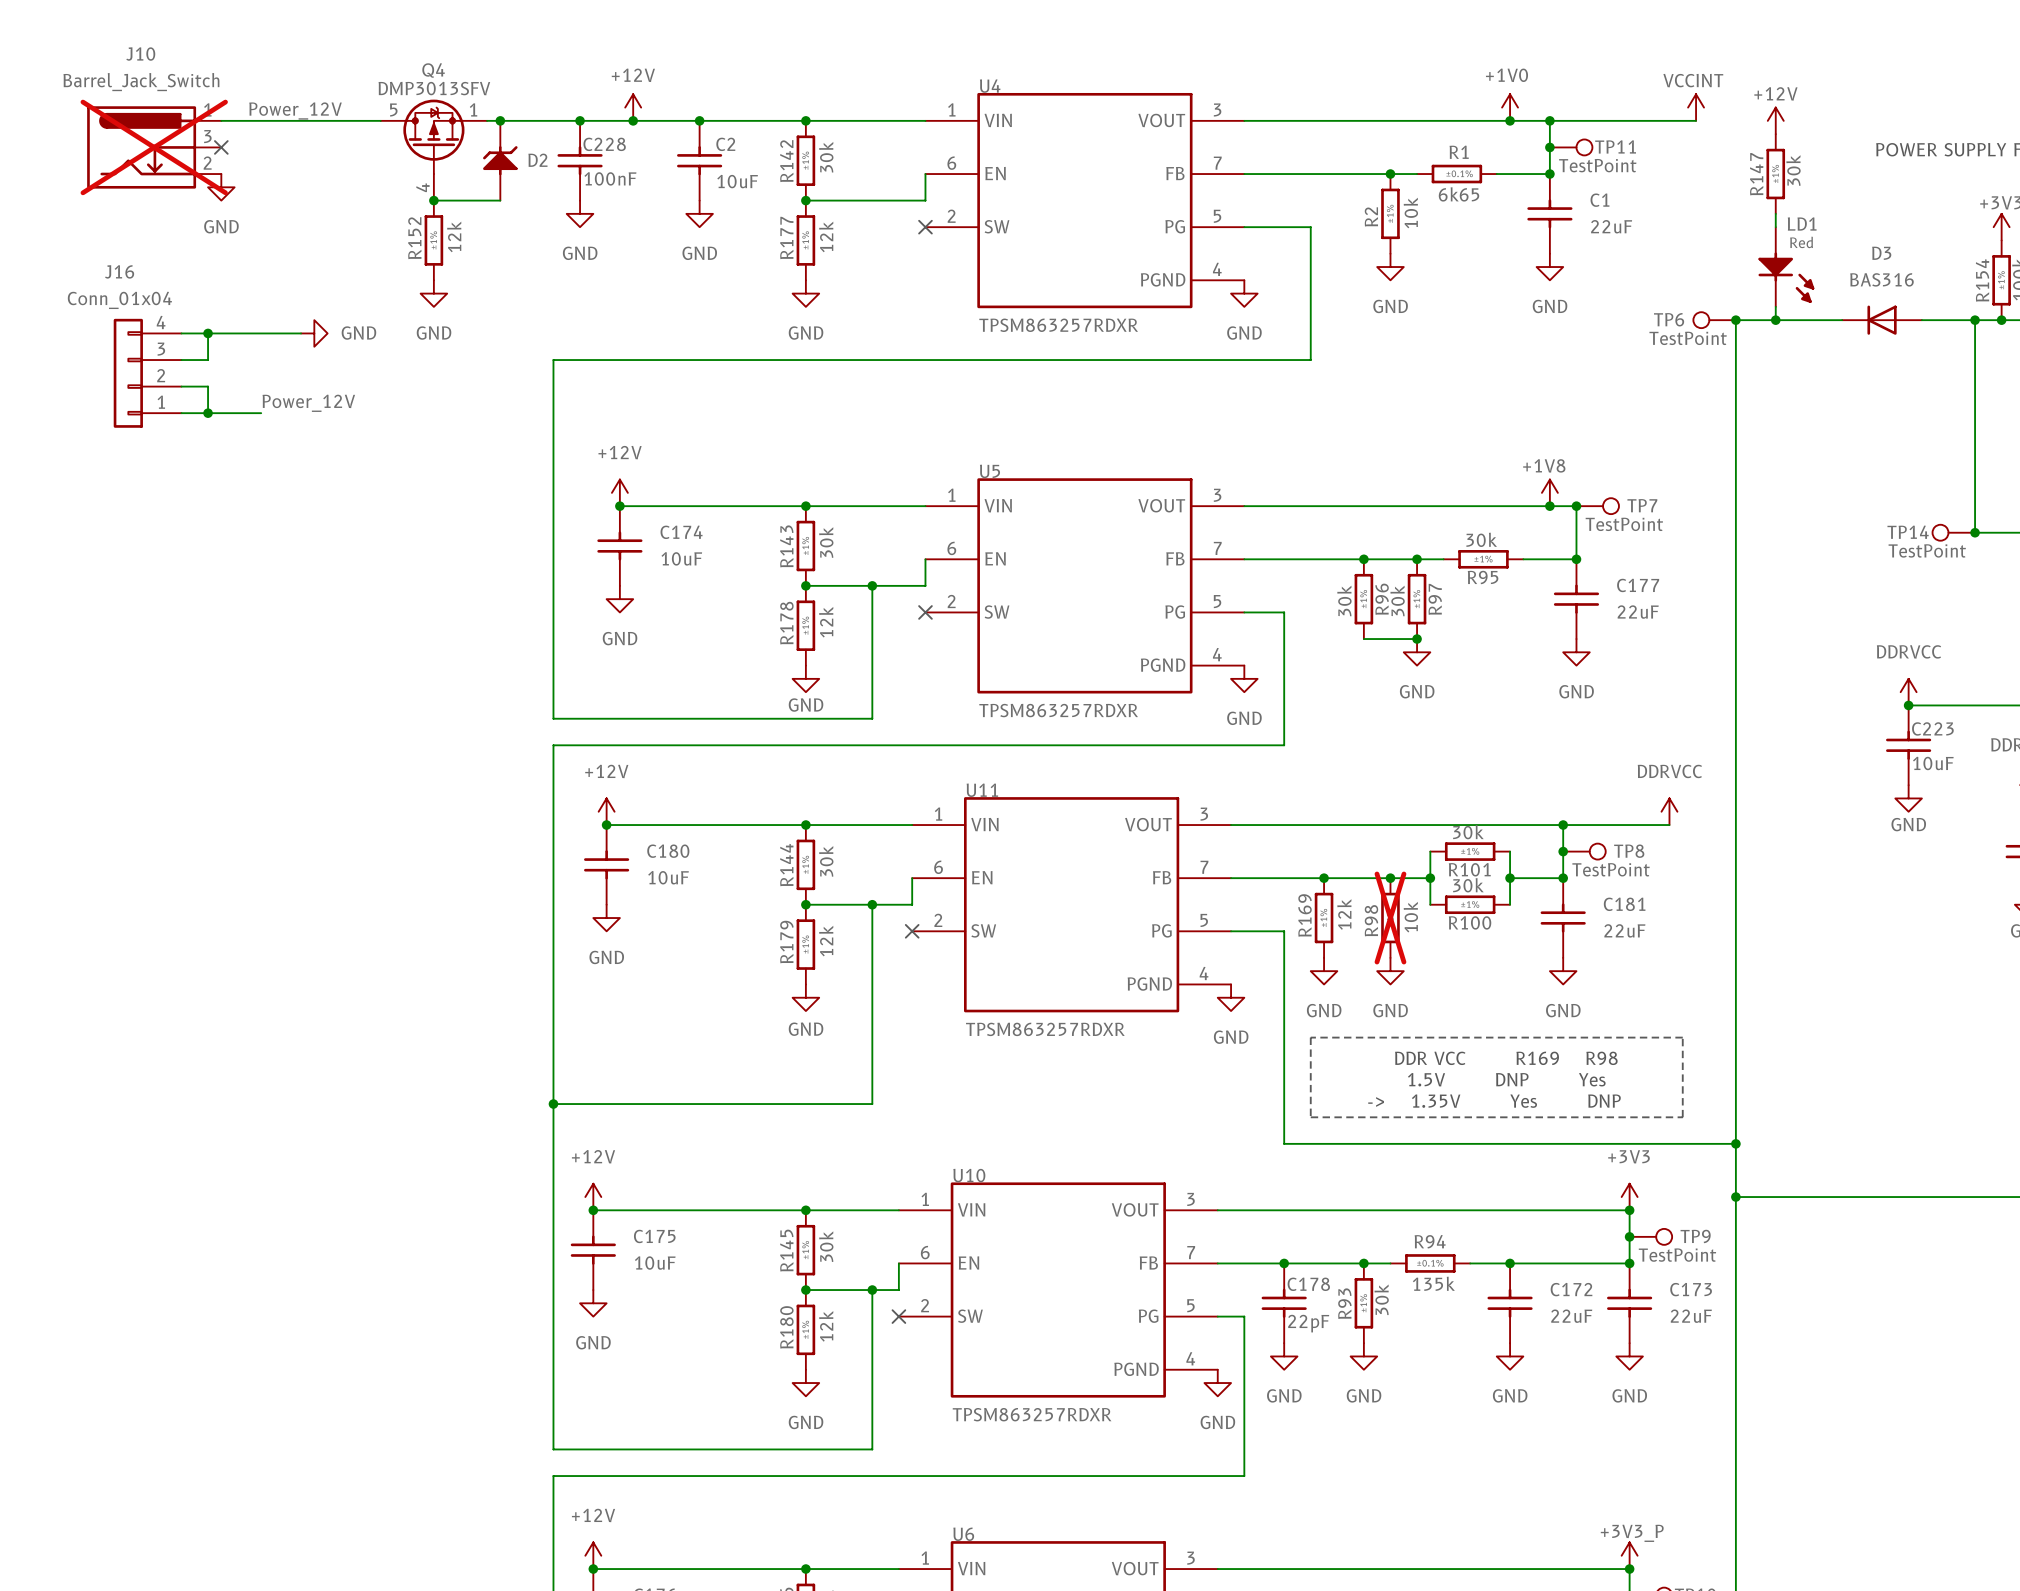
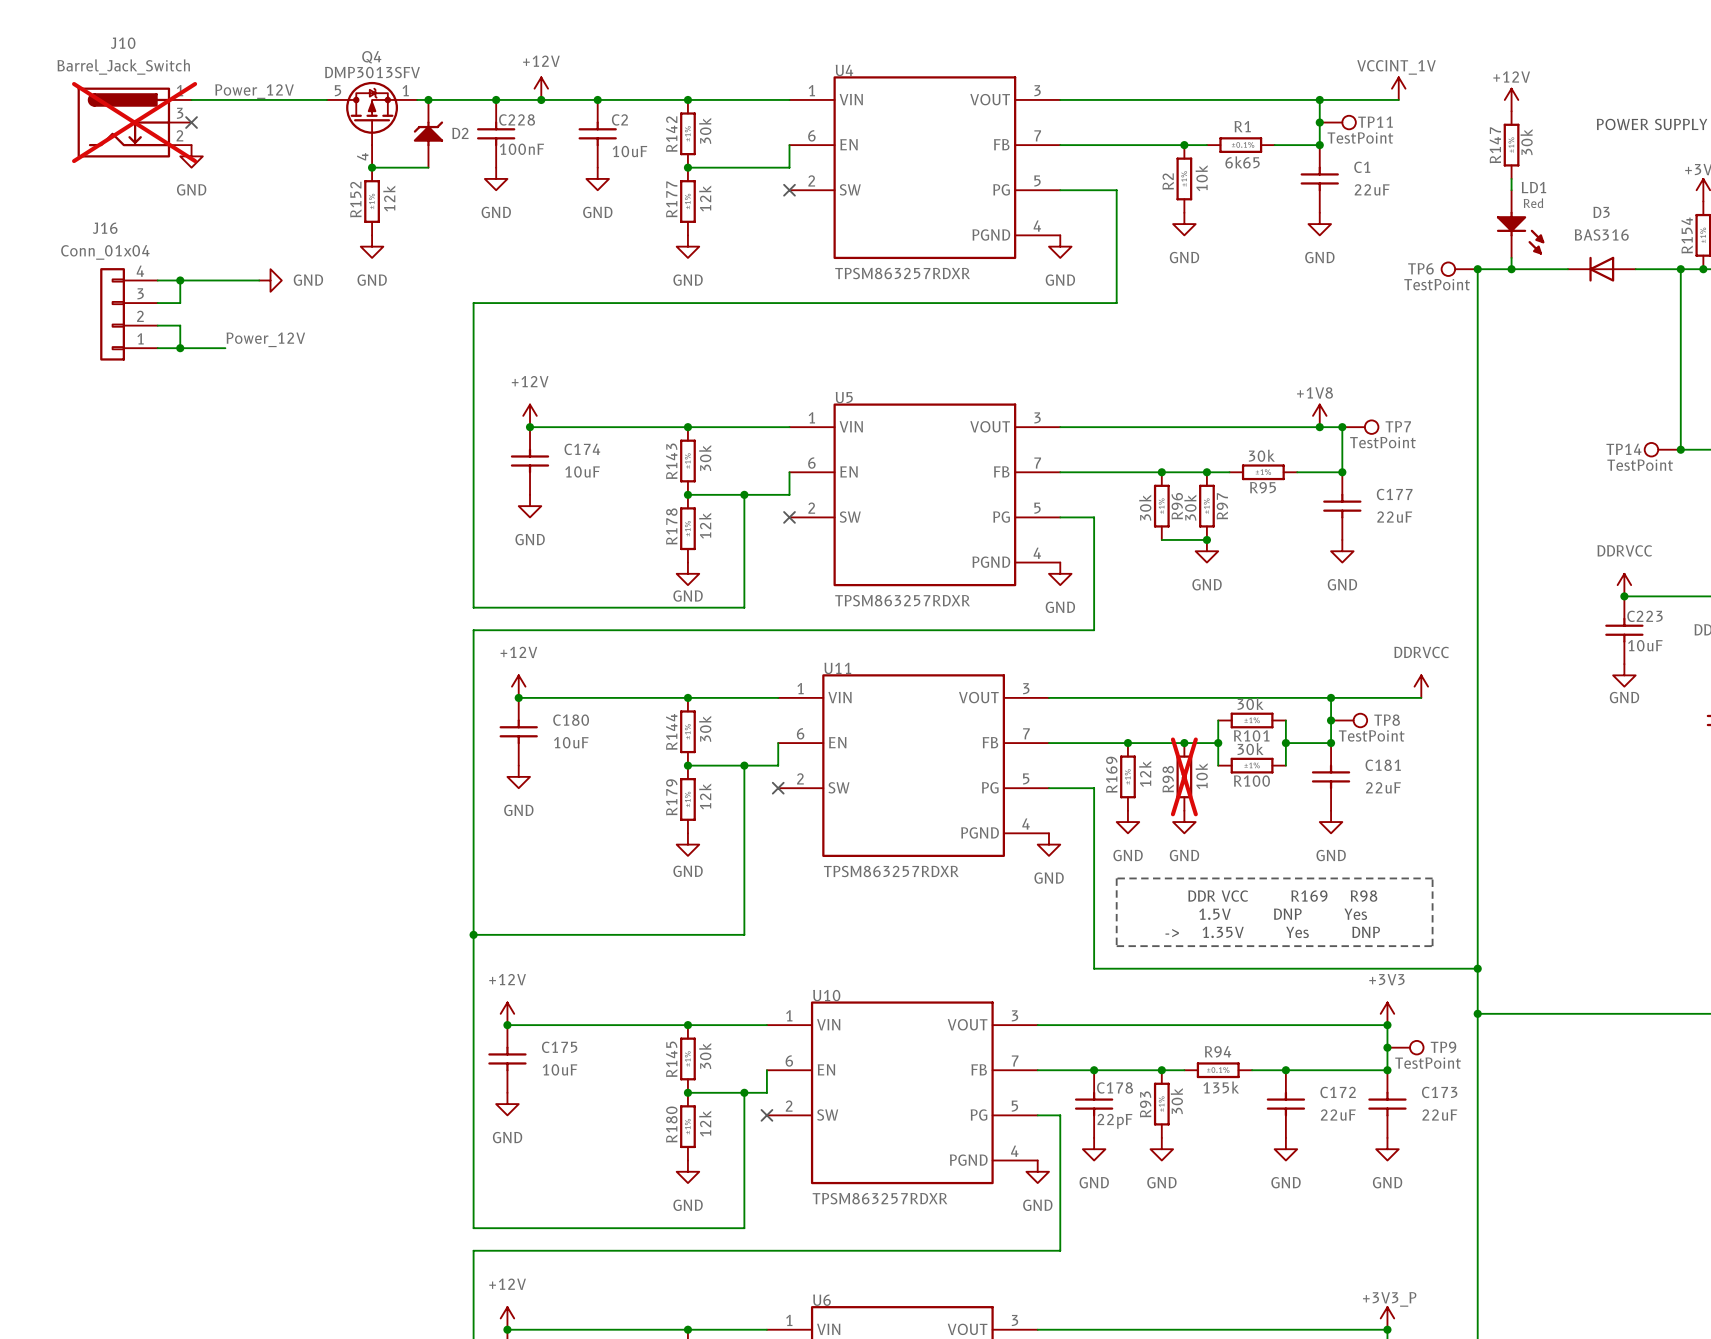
power symbol: +1V0 (1510, 107) -> none
power symbol: none -> VCCINT_1V (1398, 88)
power symbol: VCCINT (1696, 107) -> none
junction: (1510, 120) -> none
wire: (1642, 120) (1696, 120) -> none

